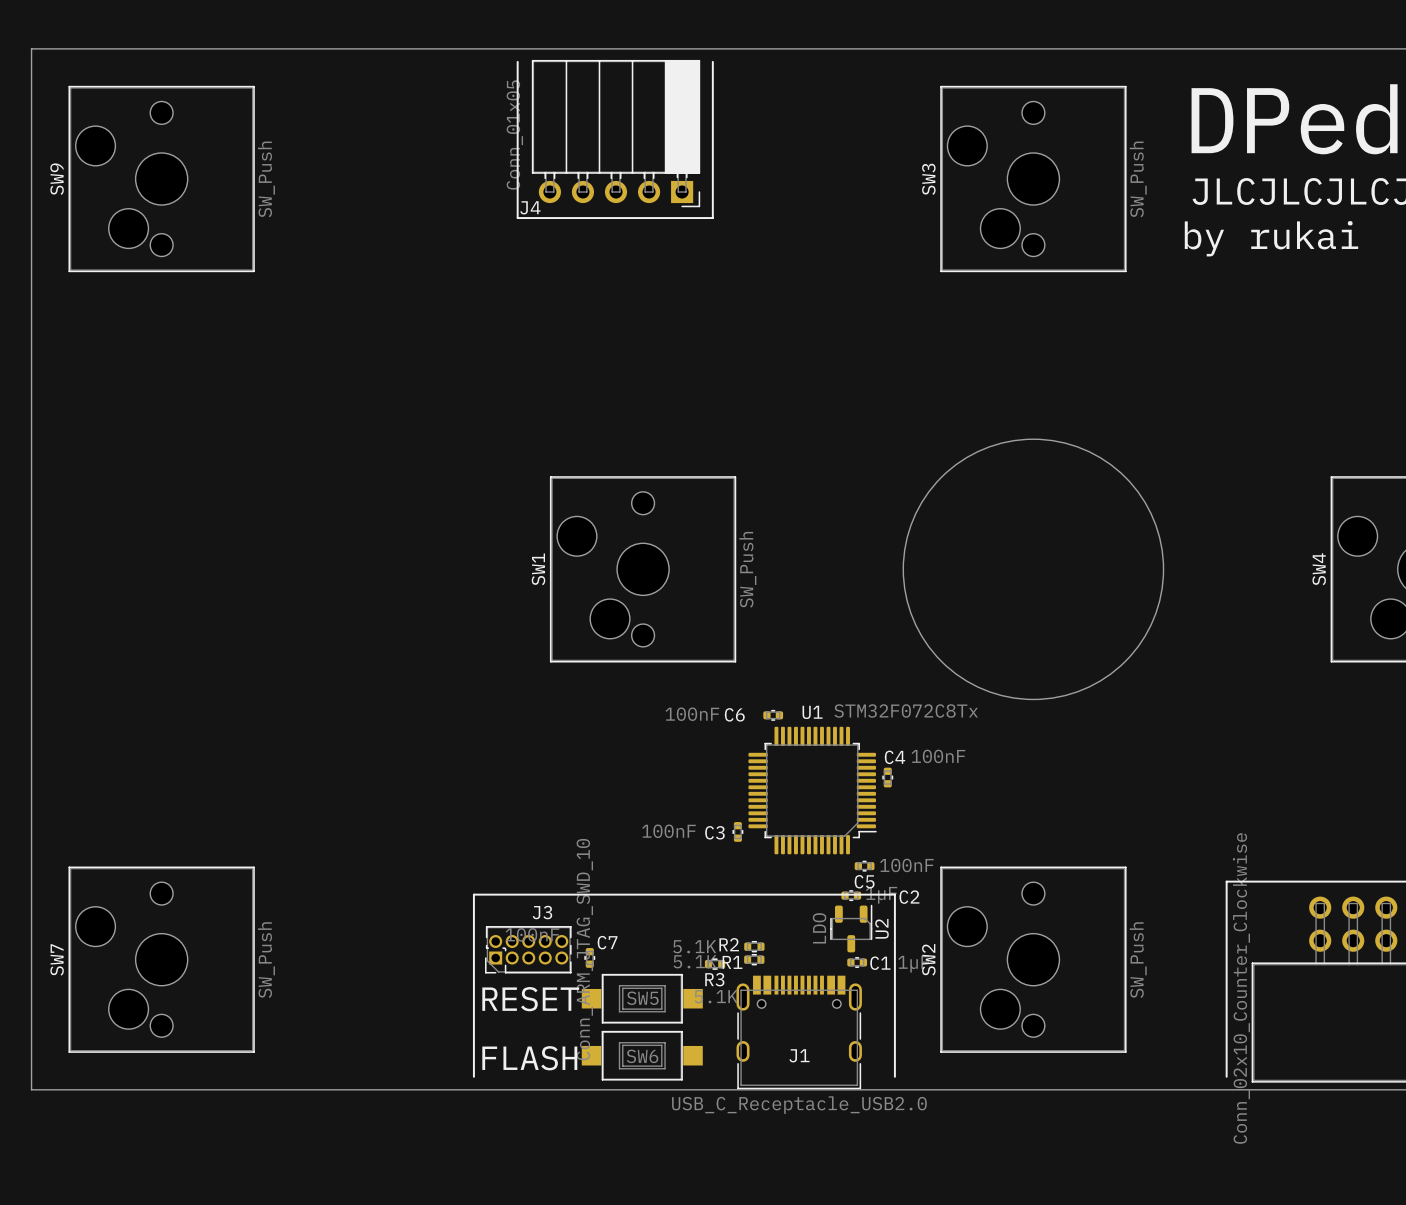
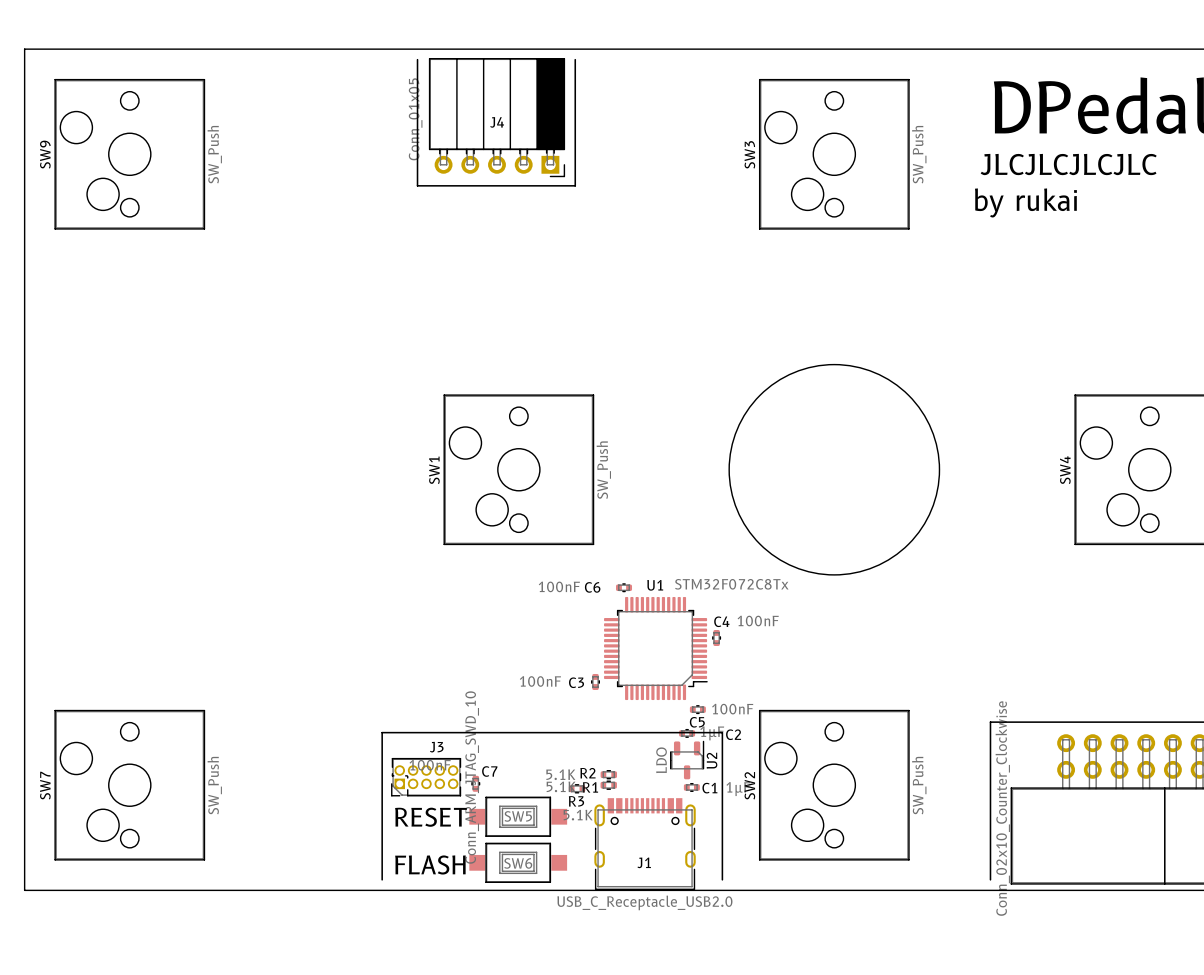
J4 name position: J4 (530, 207) -> J4 (497, 122)

